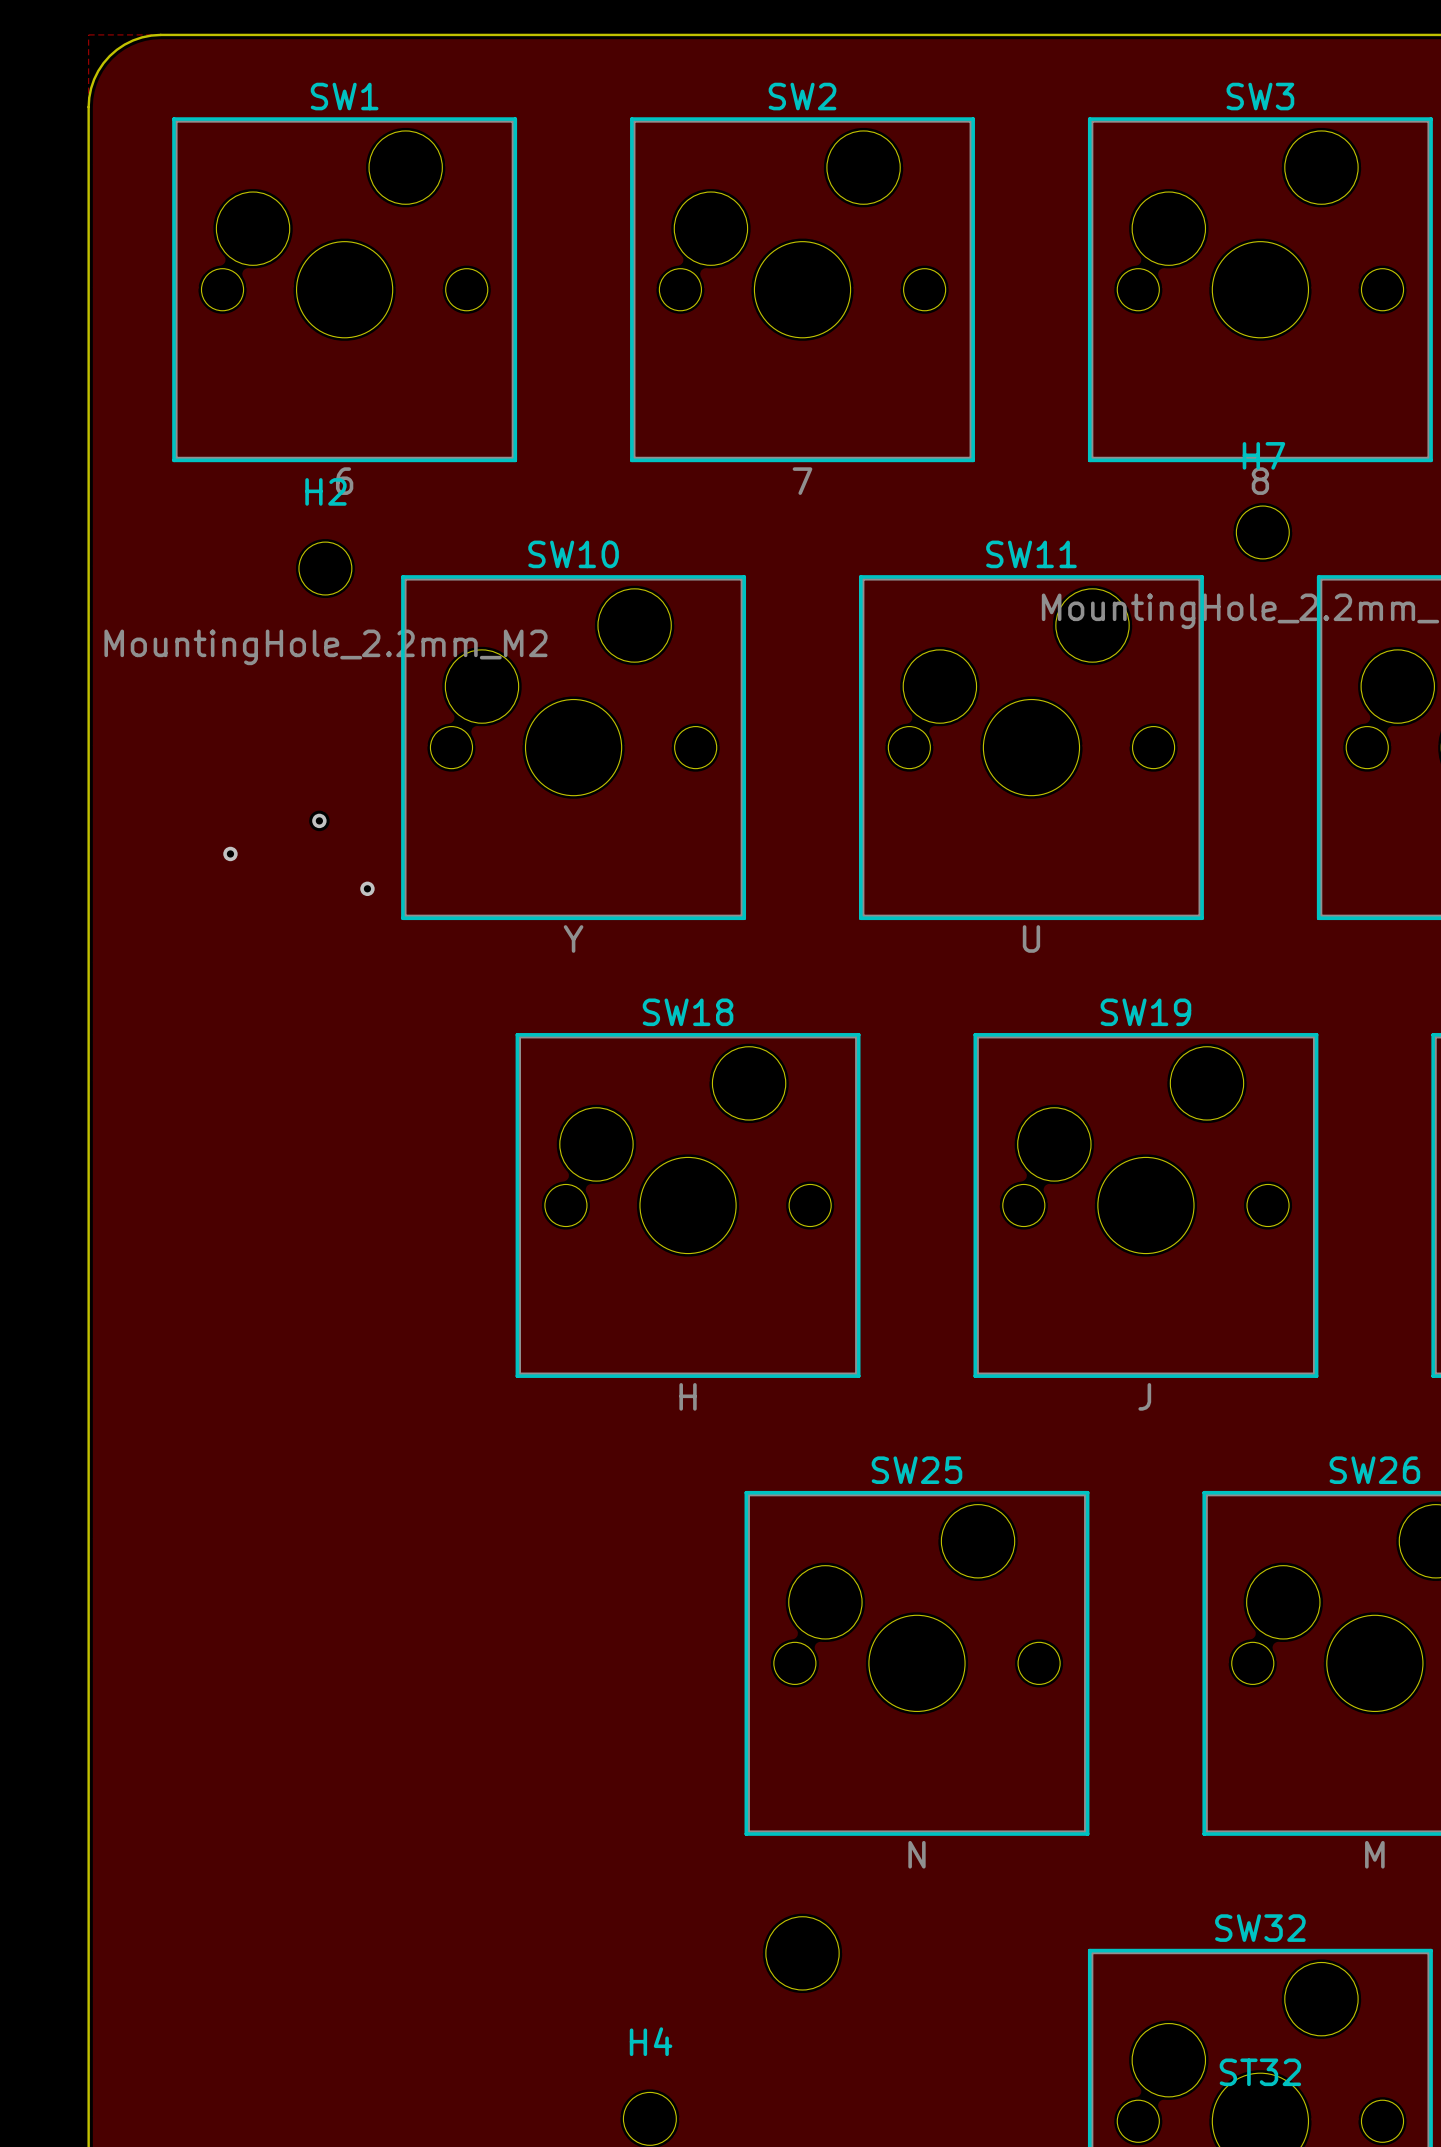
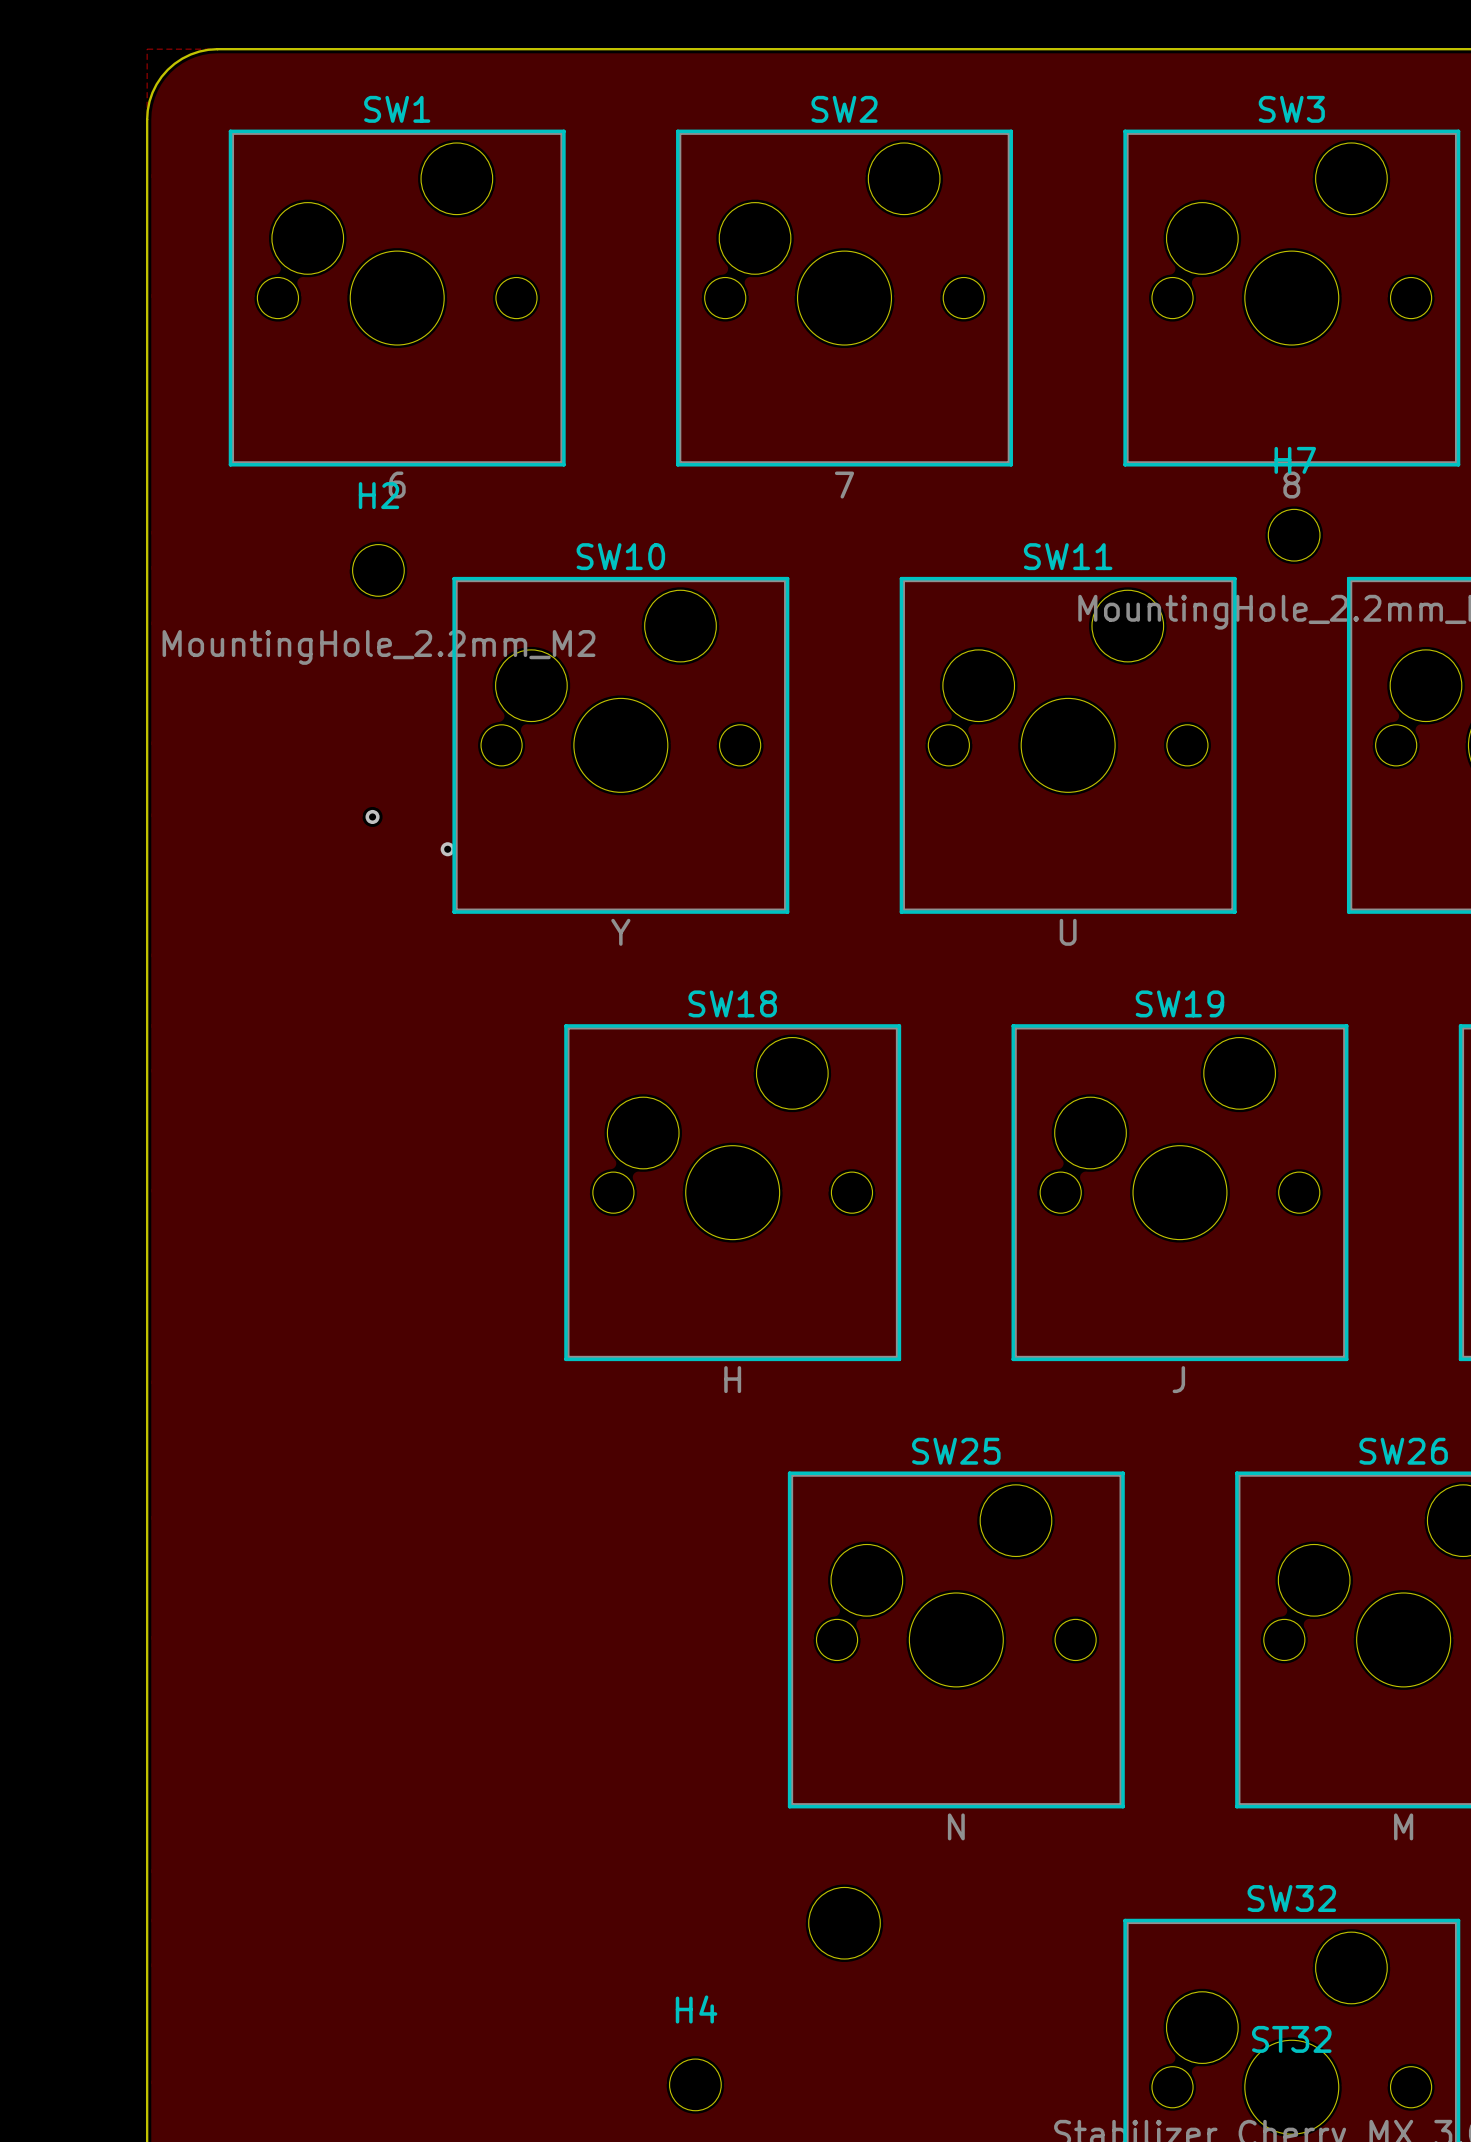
via: (230, 853) -> none
via position: (367, 888) -> (447, 849)

